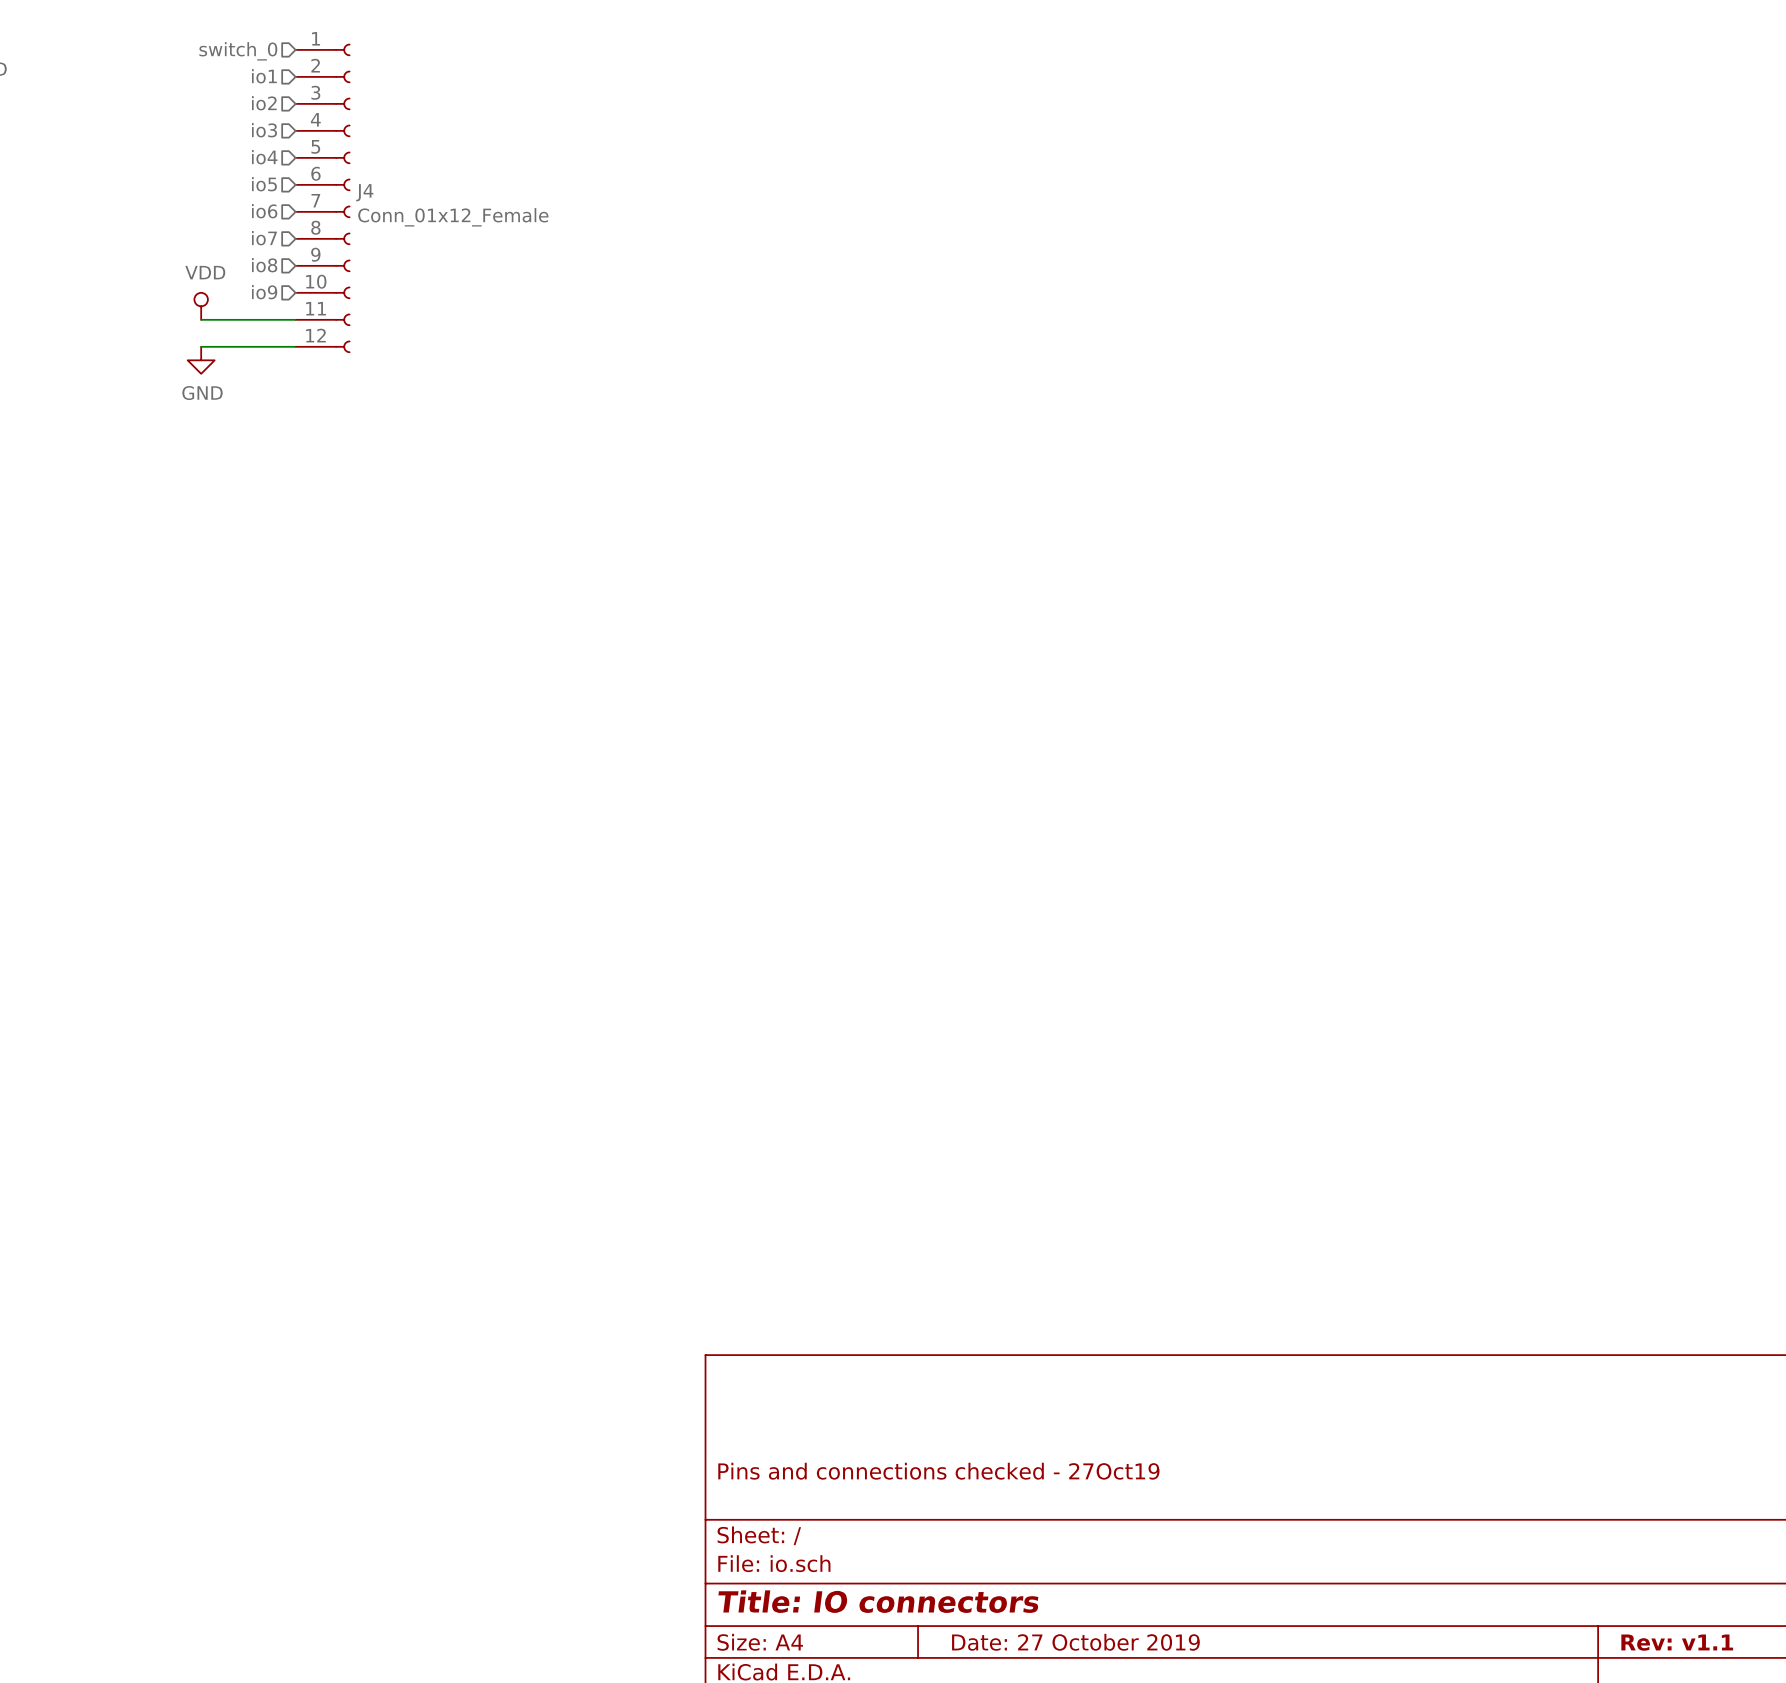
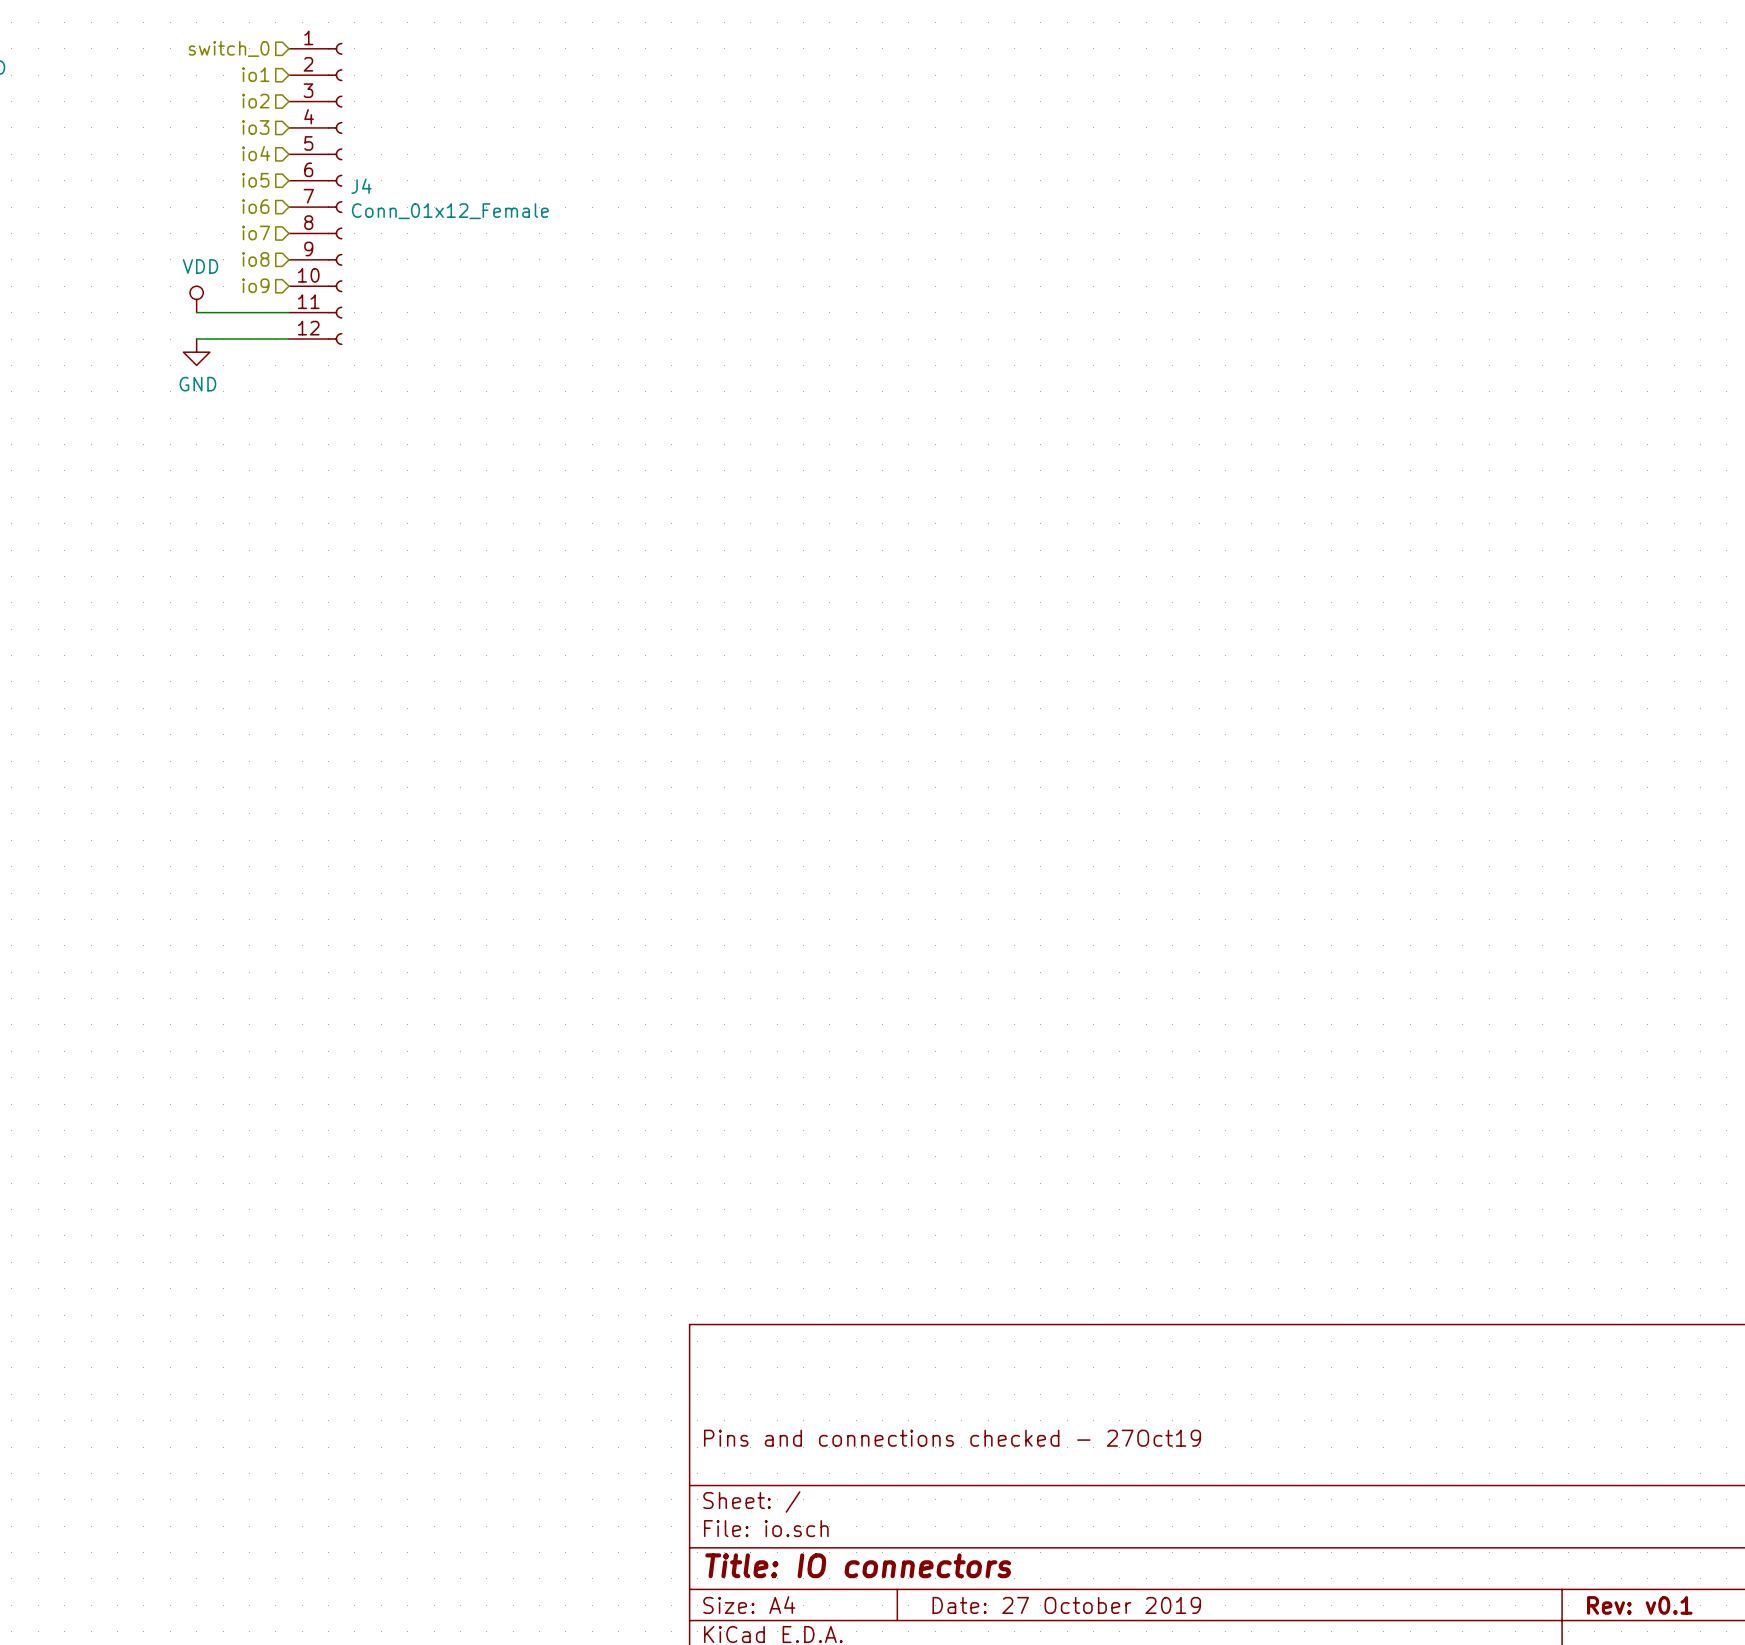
title block: Rev: v1.1 (1677, 1642) -> Rev: v0.1 (1639, 1605)

